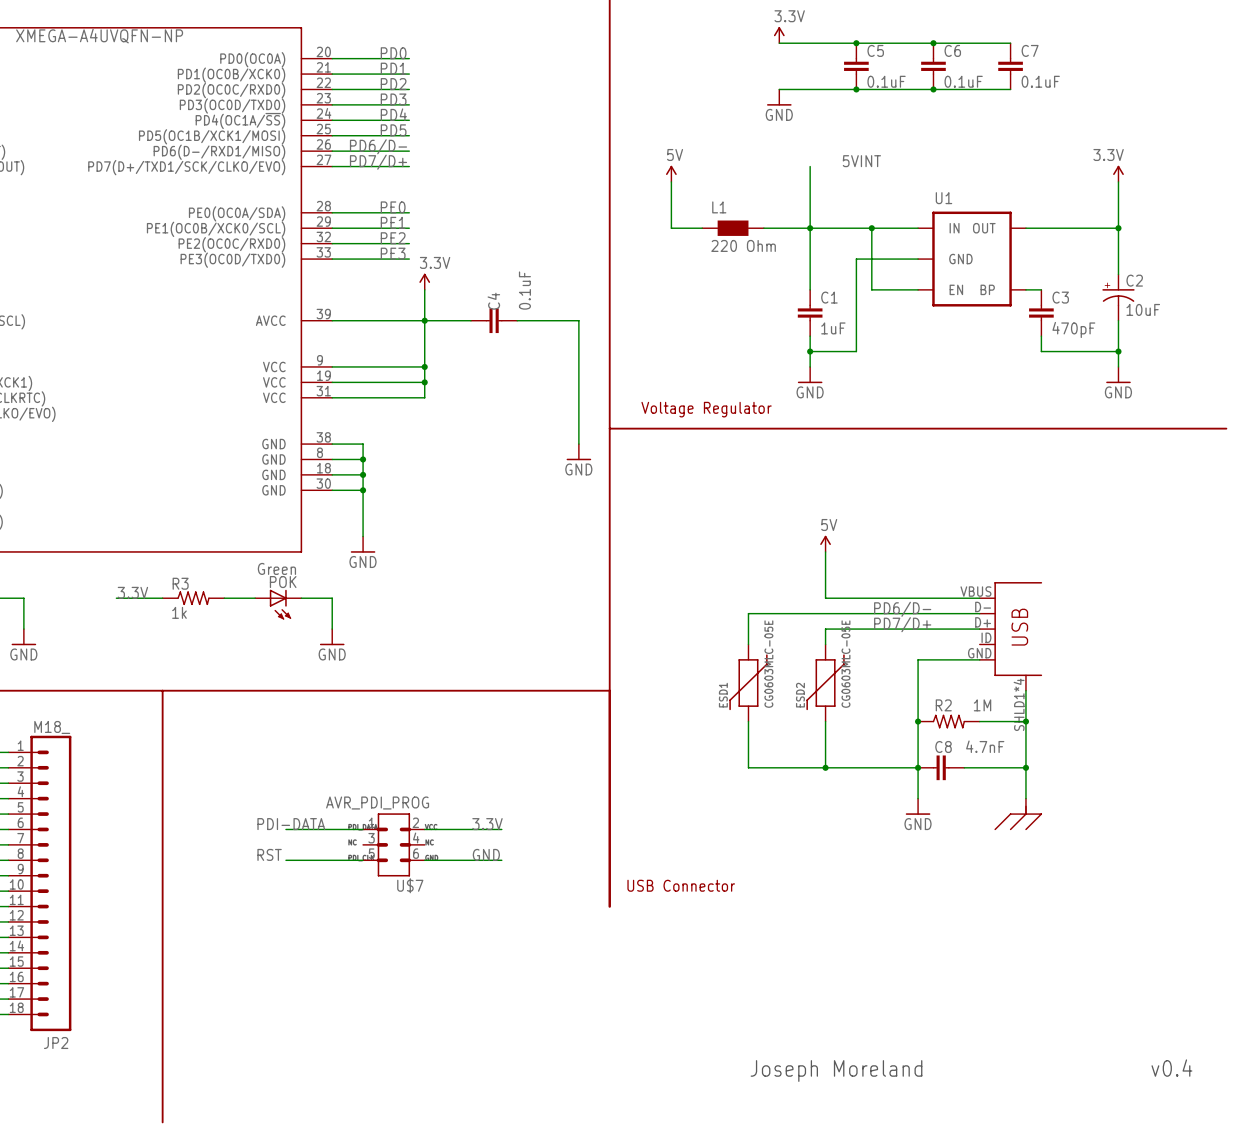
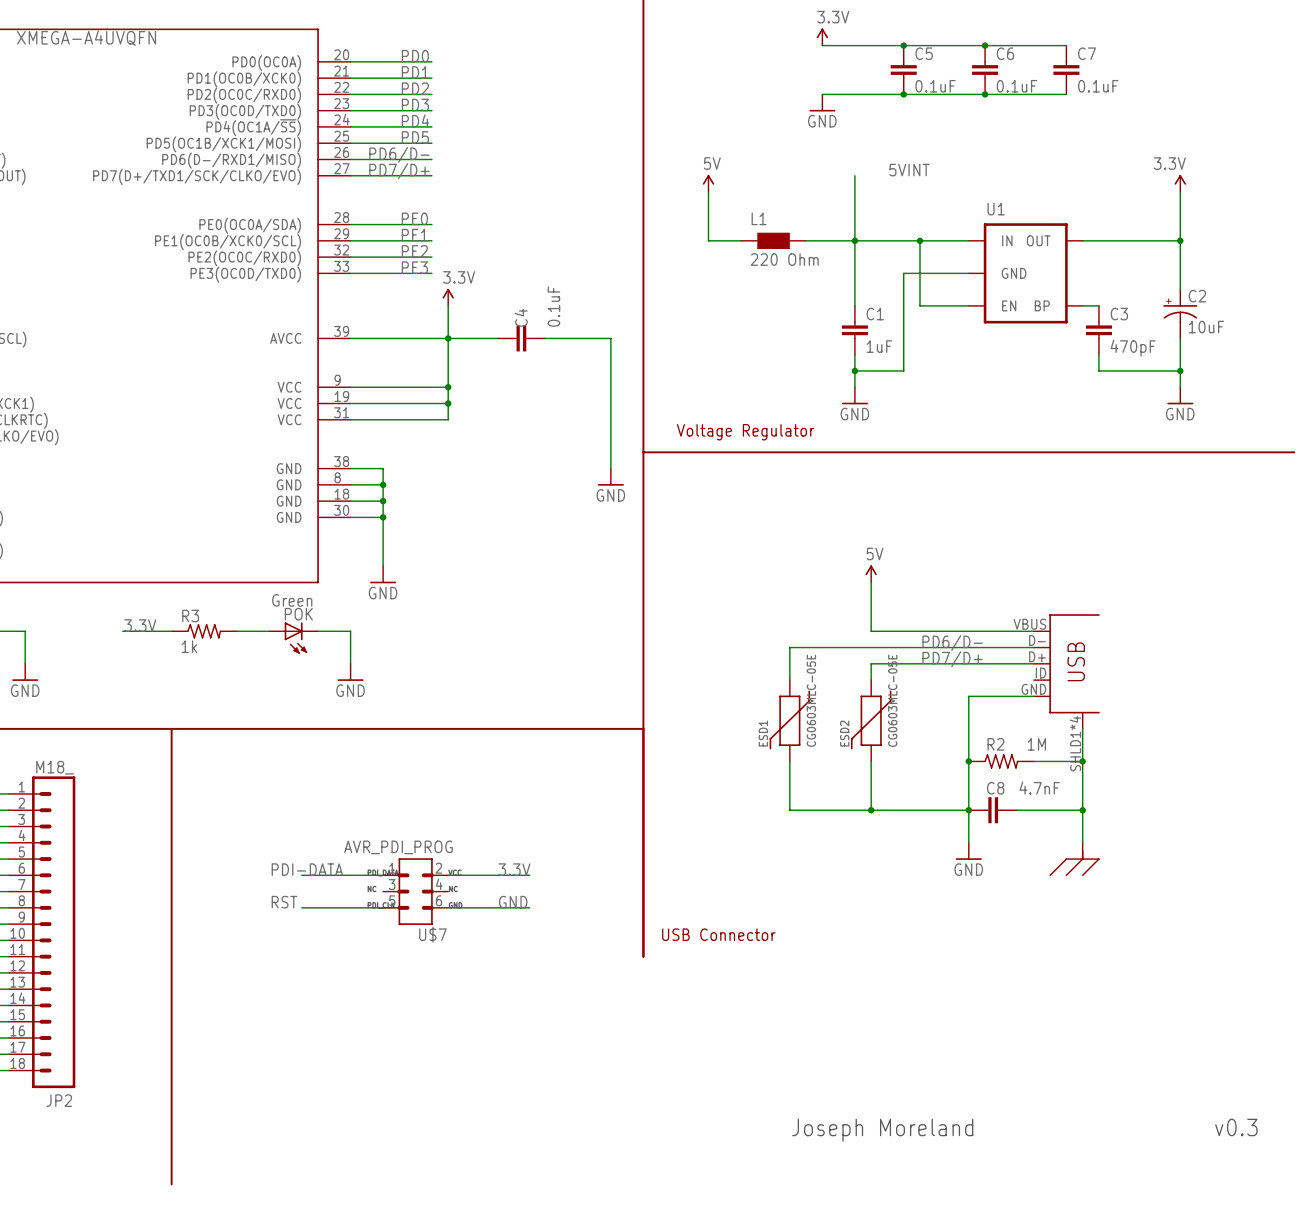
part value: XMEGA-A4UVQFN-NP (99, 36) -> XMEGA-A4UVQFN (86, 38)
text: v0.4 (1171, 1068) -> v0.3 (1236, 1127)

